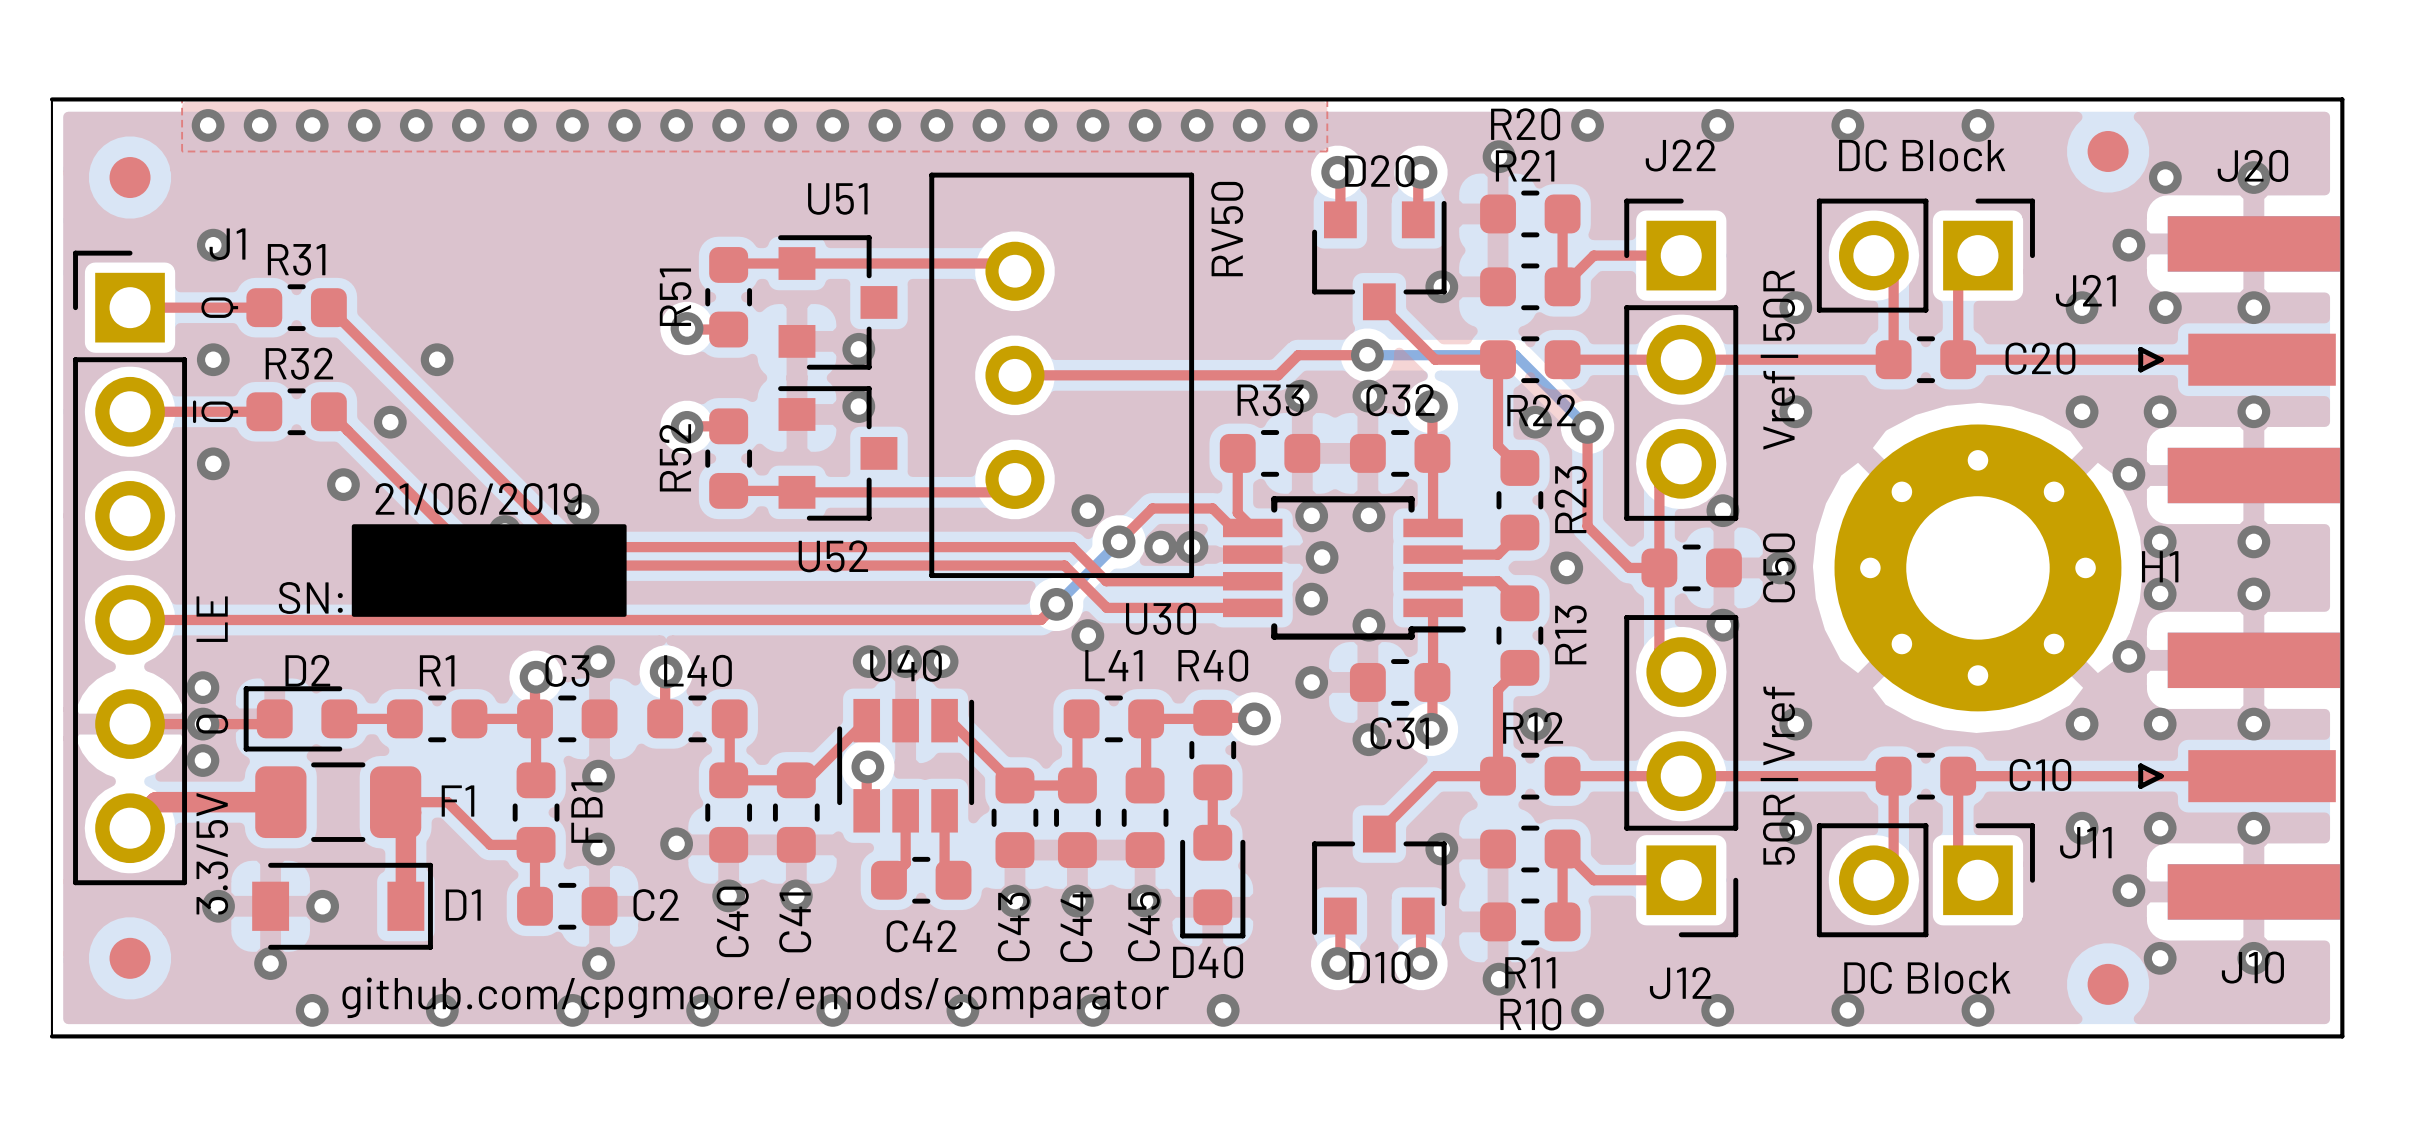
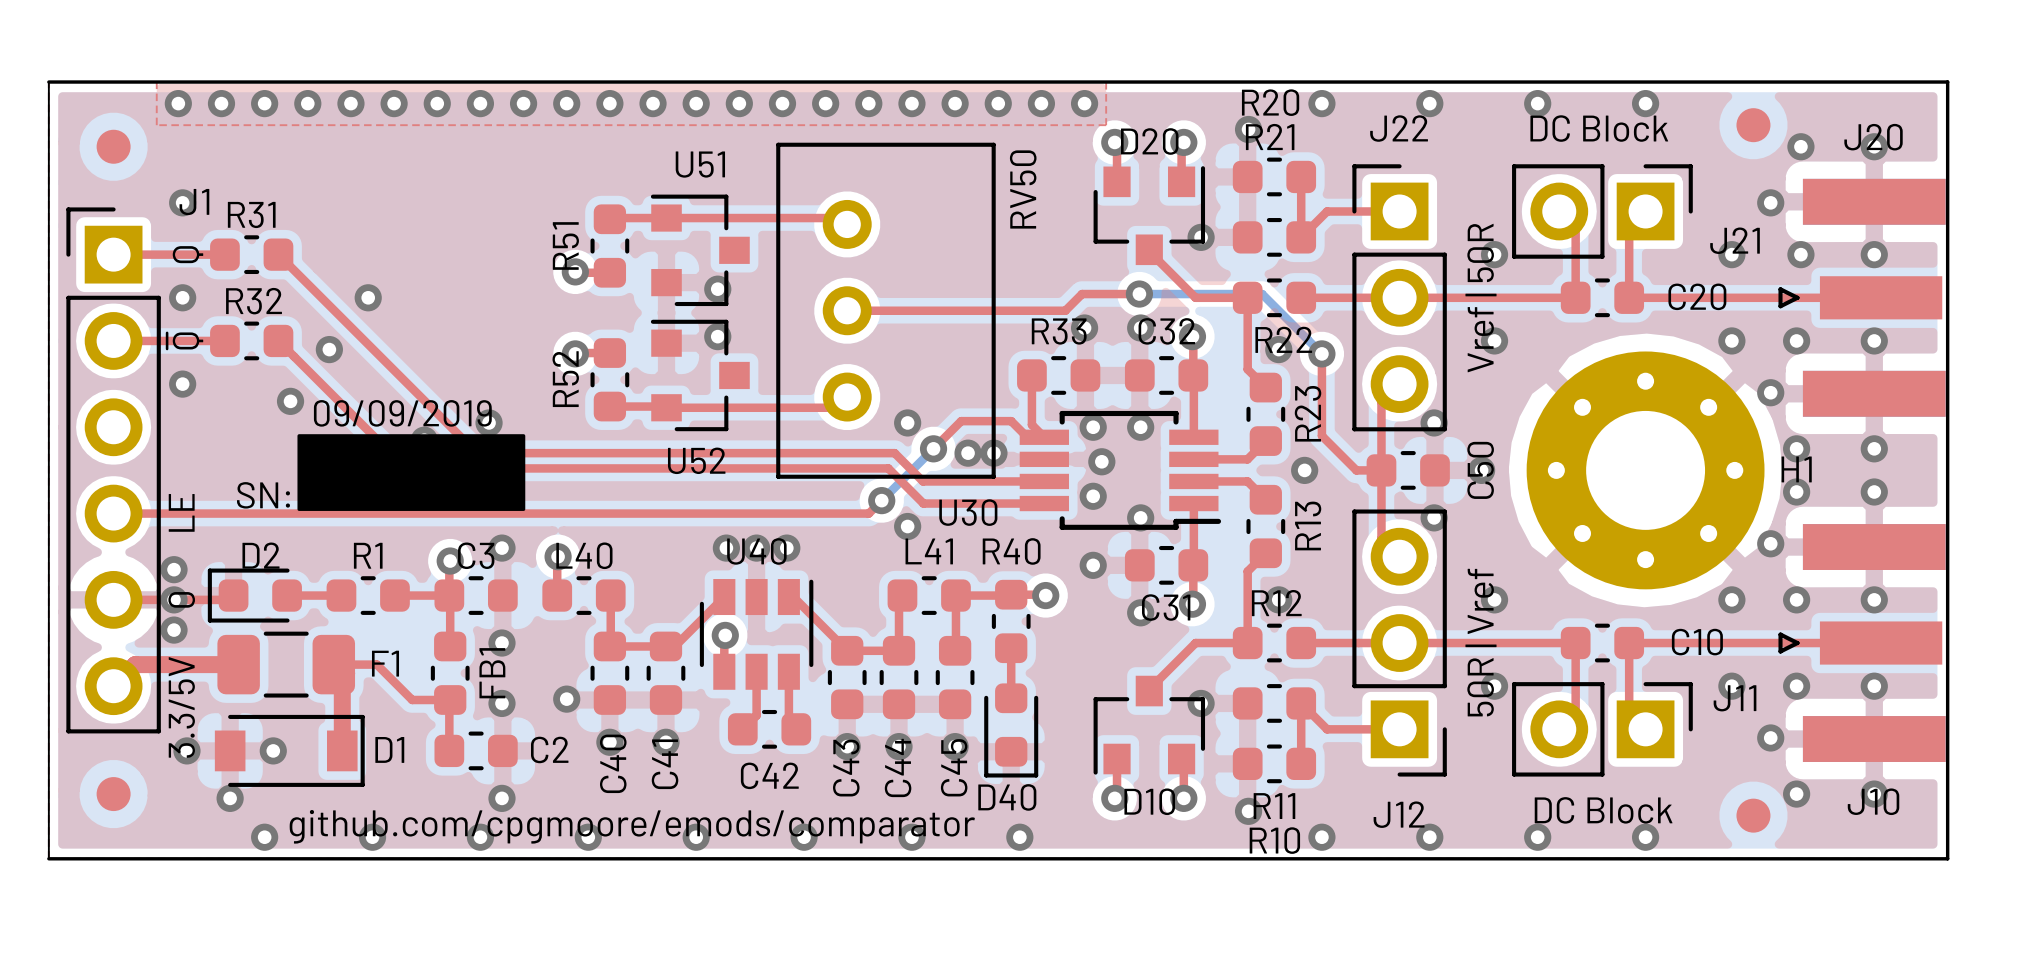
text: 21/06/2019 (478, 499) -> 09/09/2019 (402, 413)

